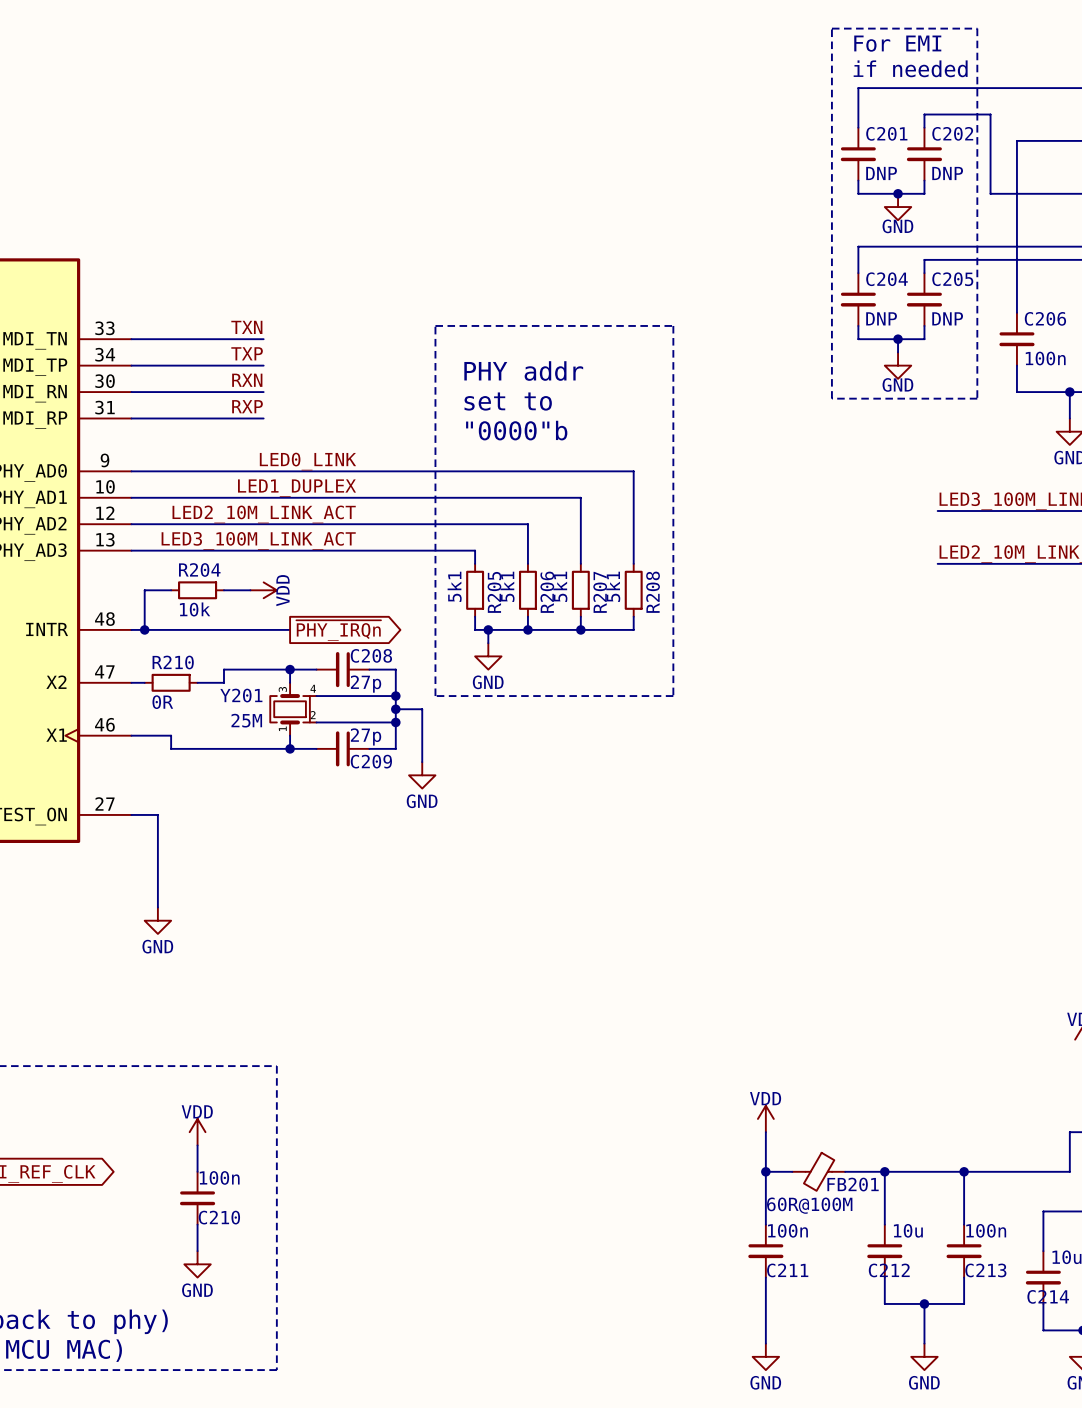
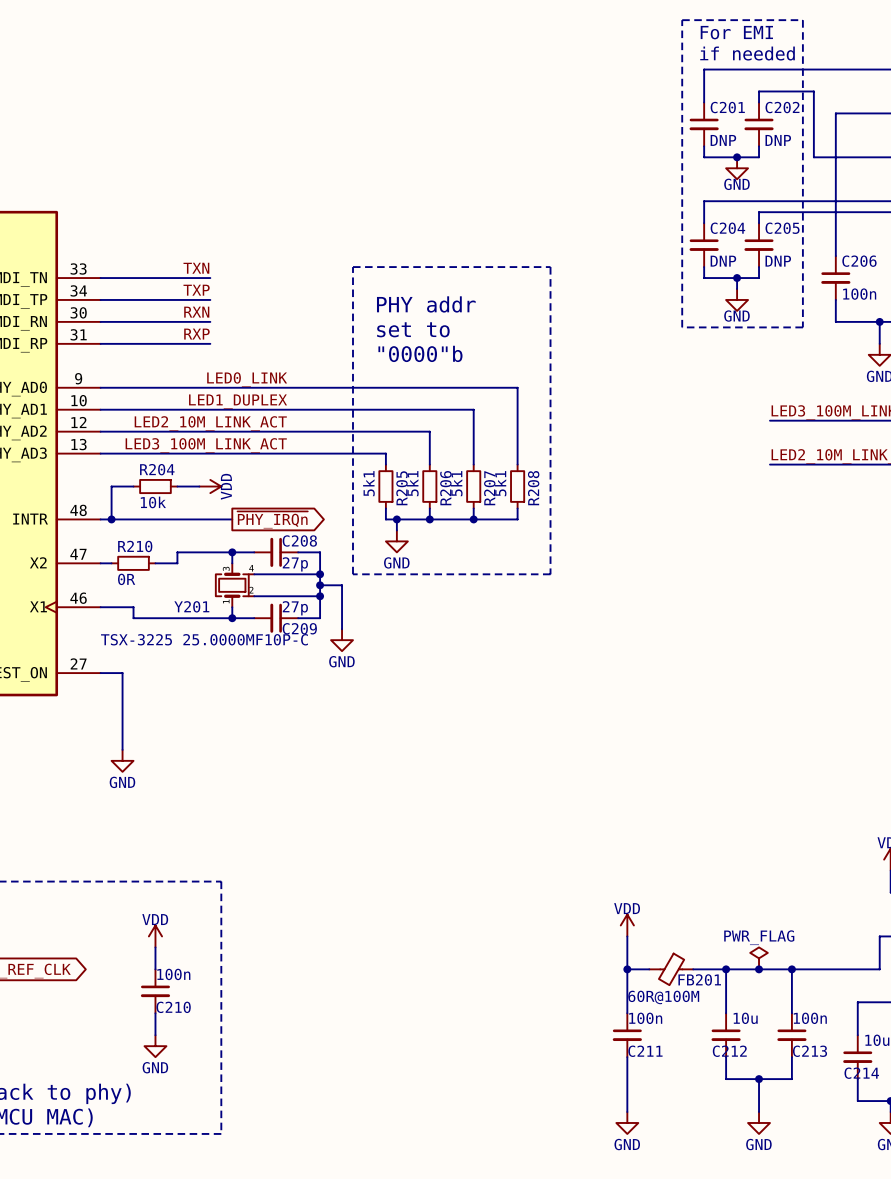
Y201 name position: Y201 (241, 695) -> Y201 (191, 606)
Y201 value: 25M (246, 720) -> TSX-3225 25.0000MF10P-C (204, 639)
power symbol: none -> PWR_FLAG (759, 958)
junction: none -> (759, 969)

